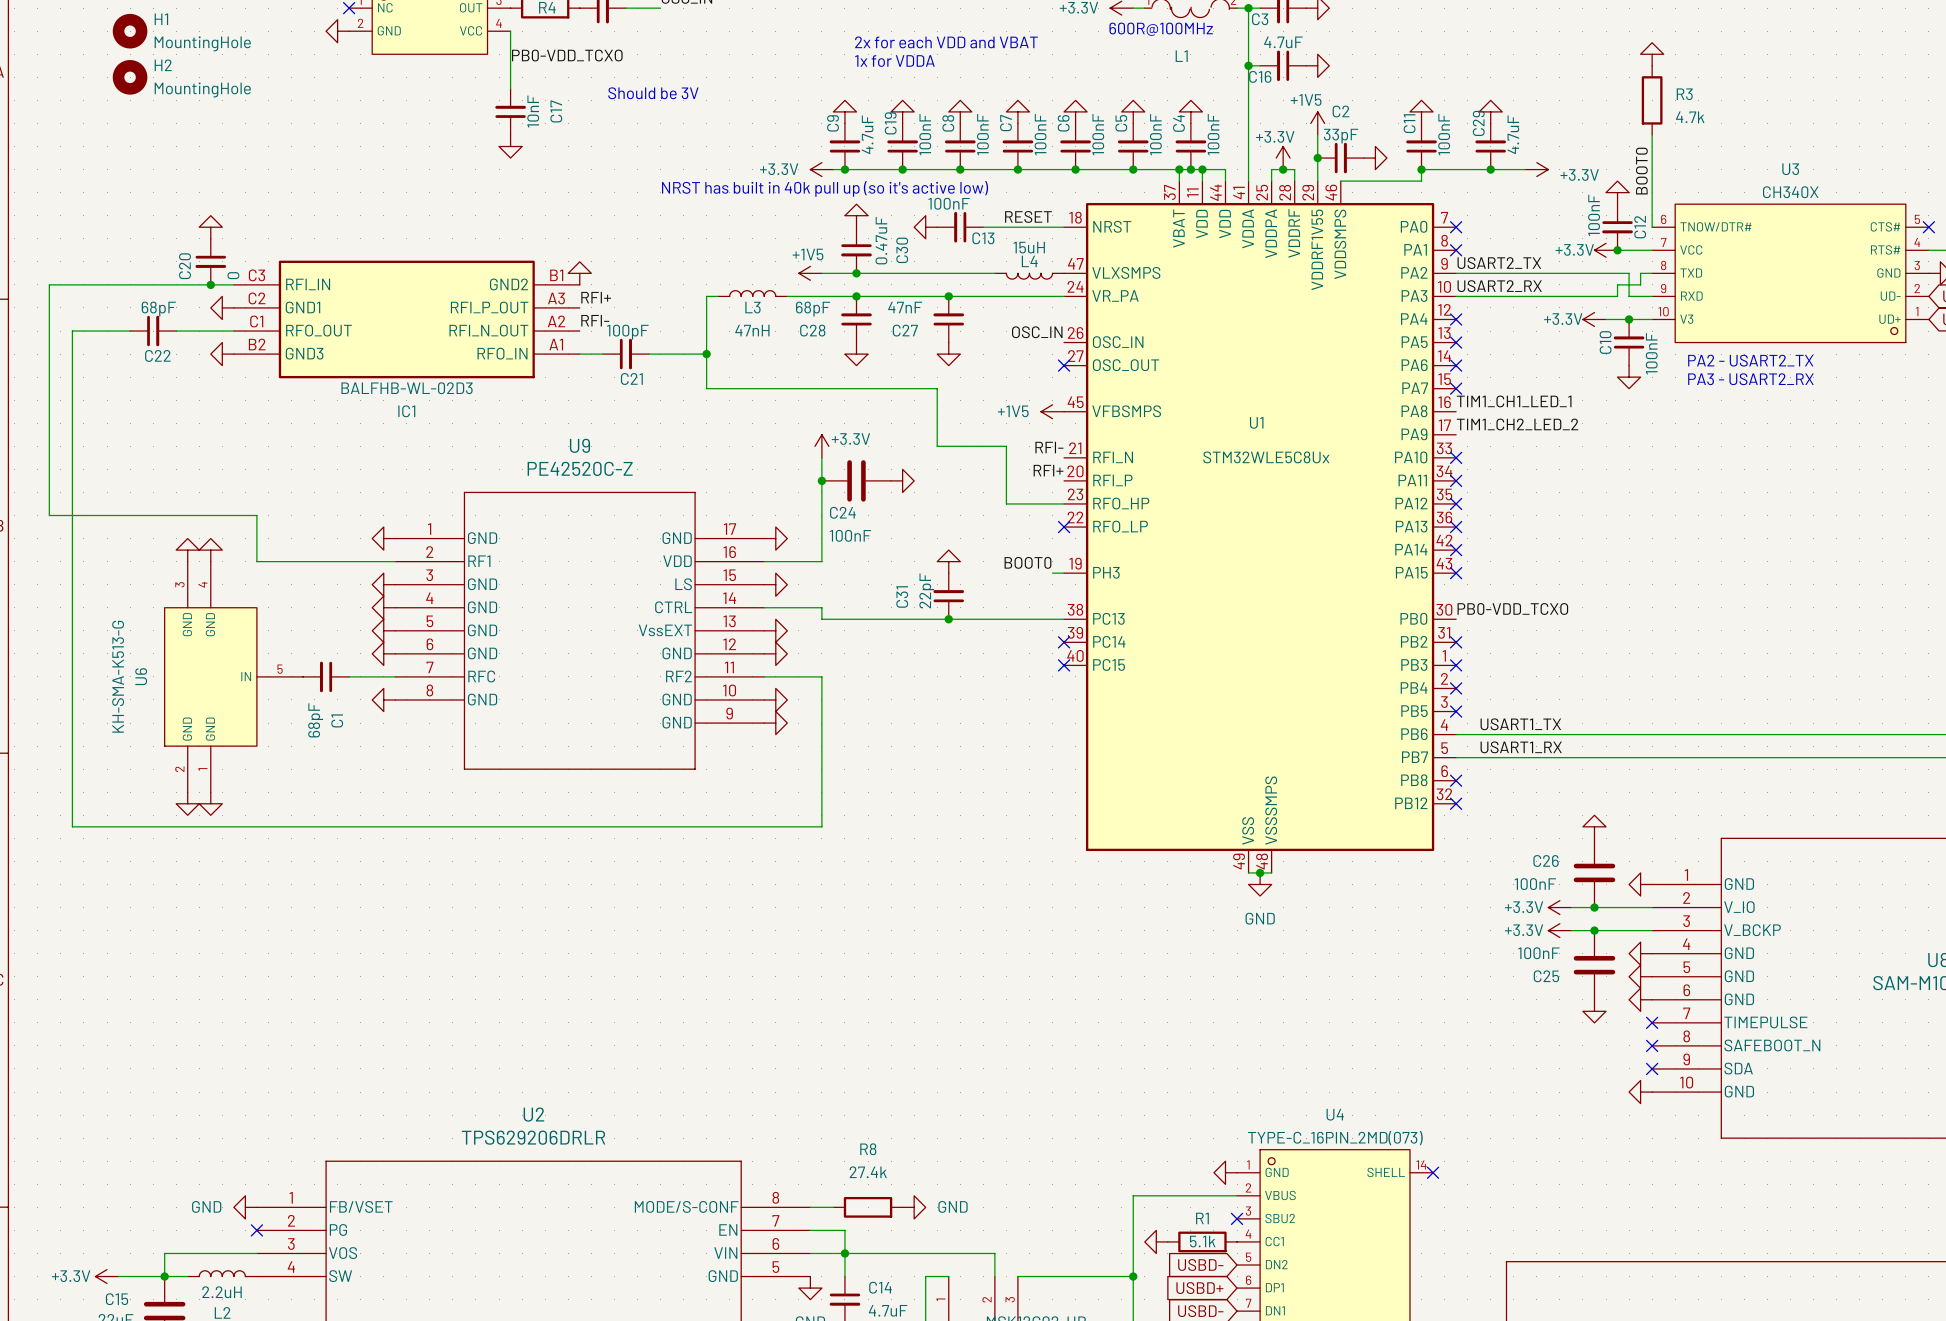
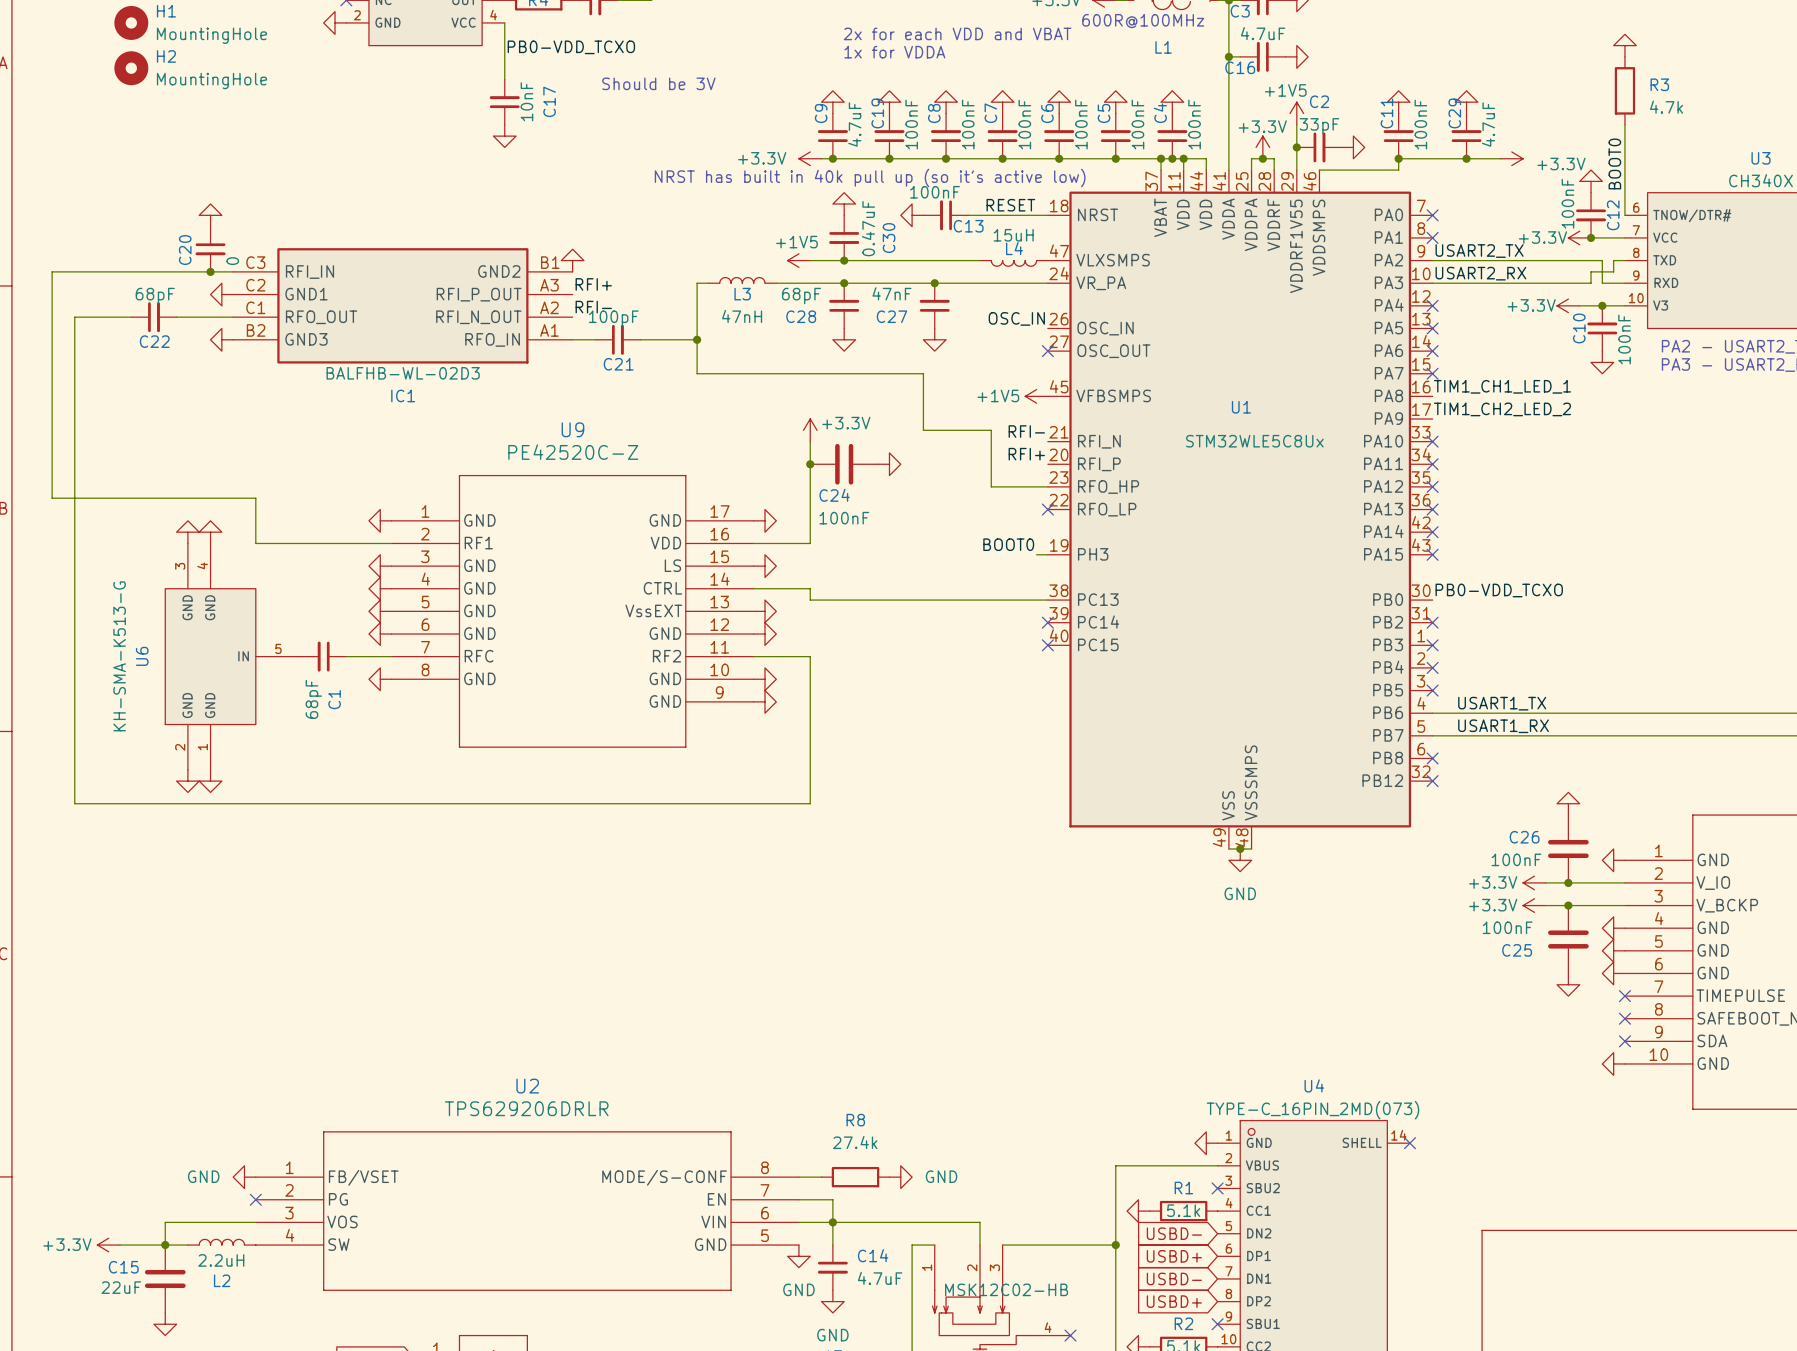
power symbol: (948, 561) -> none
C31: 22pF (948, 596) -> none
junction: (948, 619) -> none

